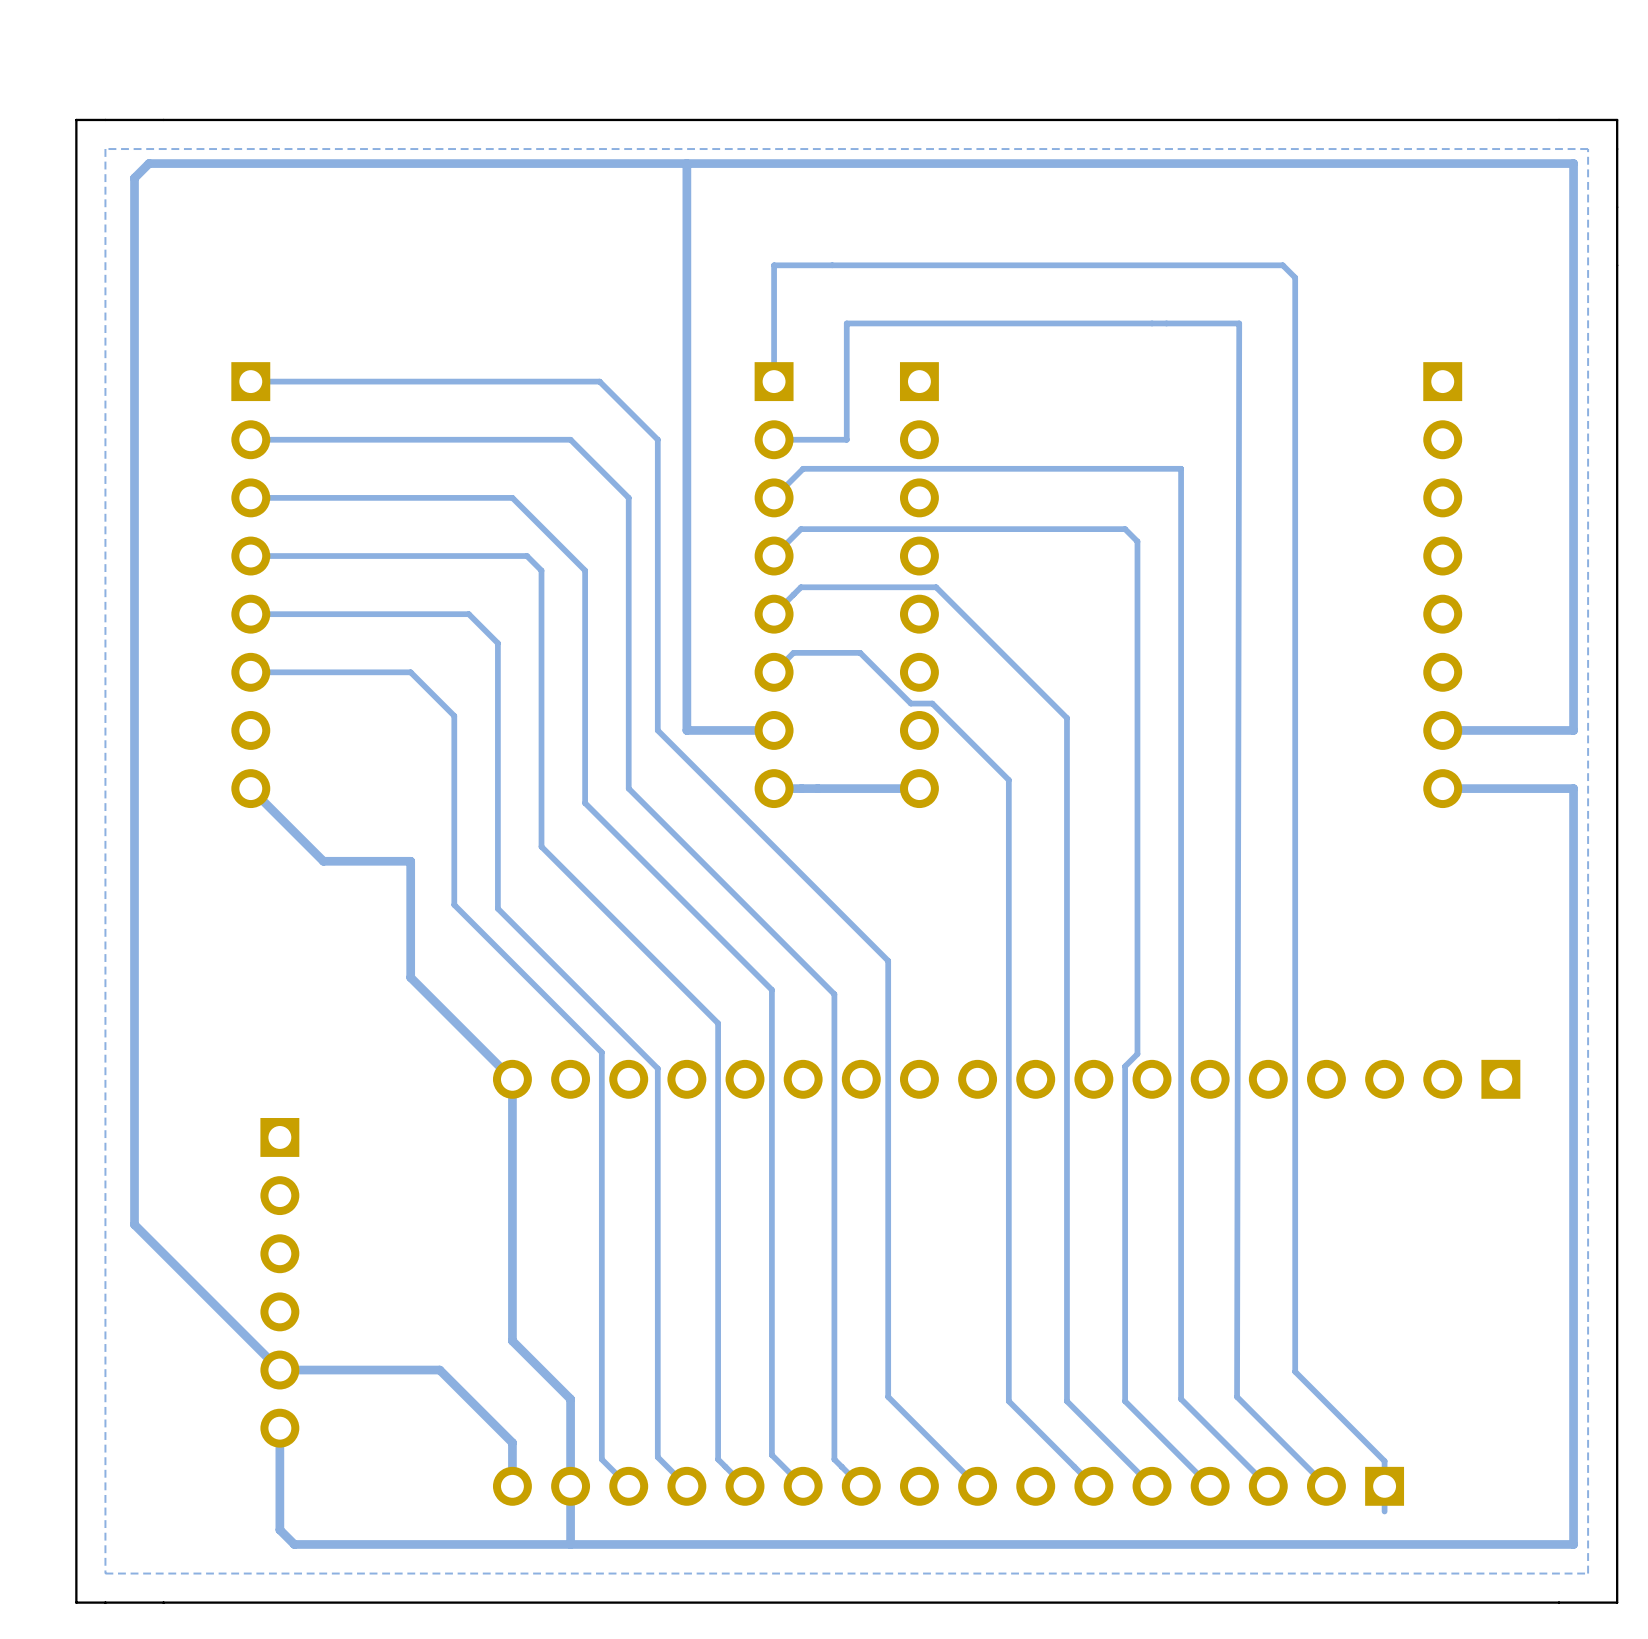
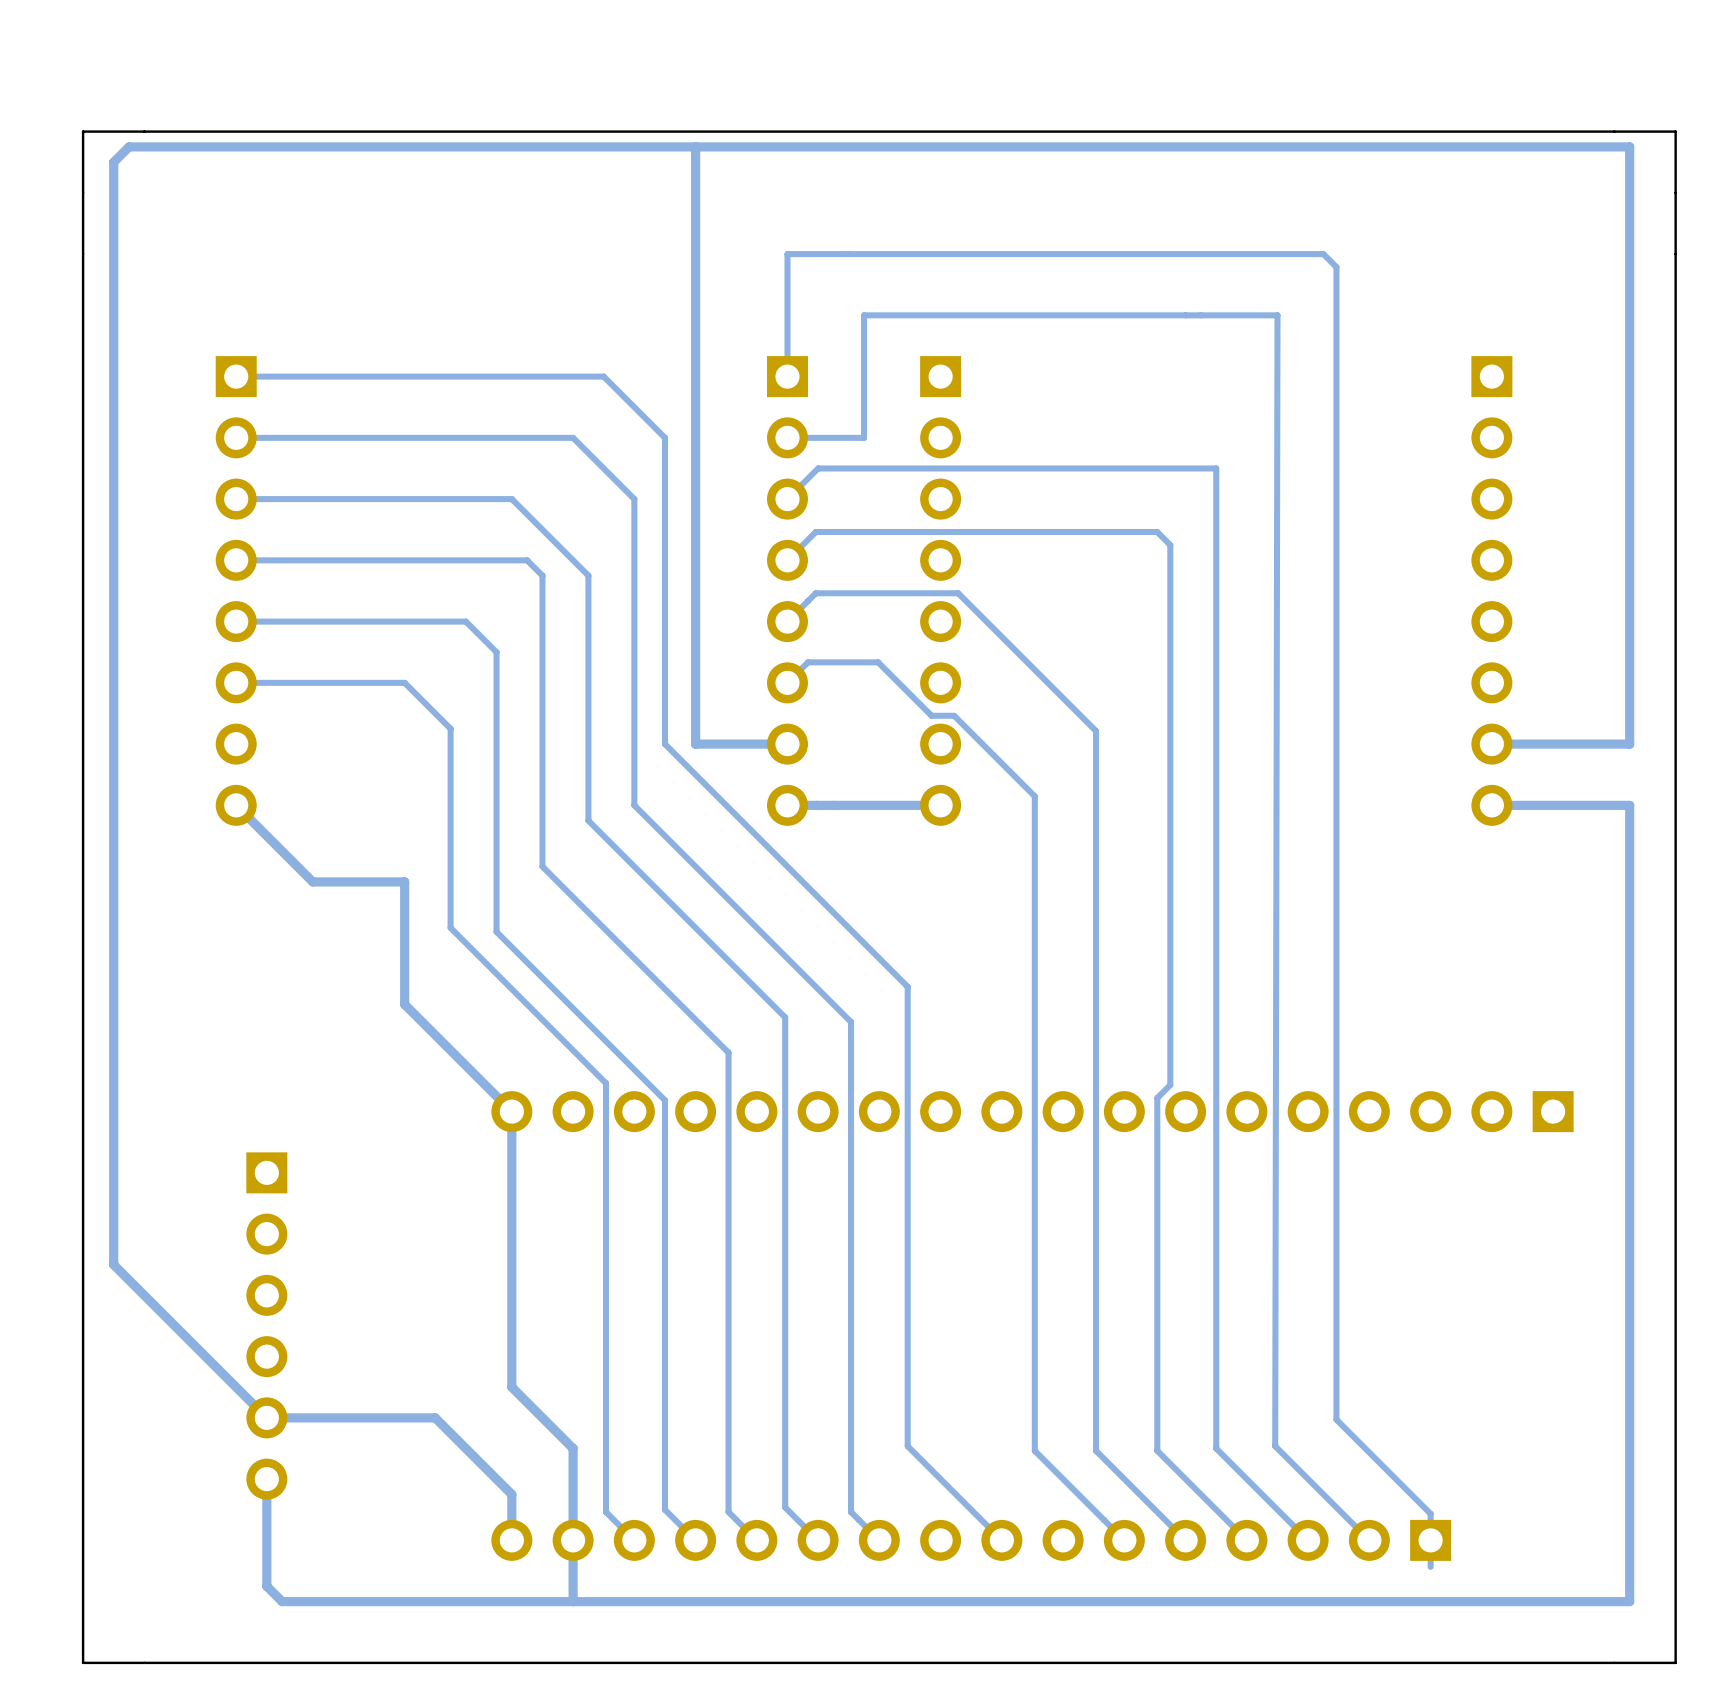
zone outline: (1588, 149) (1588, 1573) (105, 1573) (105, 149) (1588, 149) -> none
board edge: (1617, 149) (1617, 119) (76, 119) (76, 1602) (105, 1602) -> (1675, 131) (83, 131) (83, 1662)

